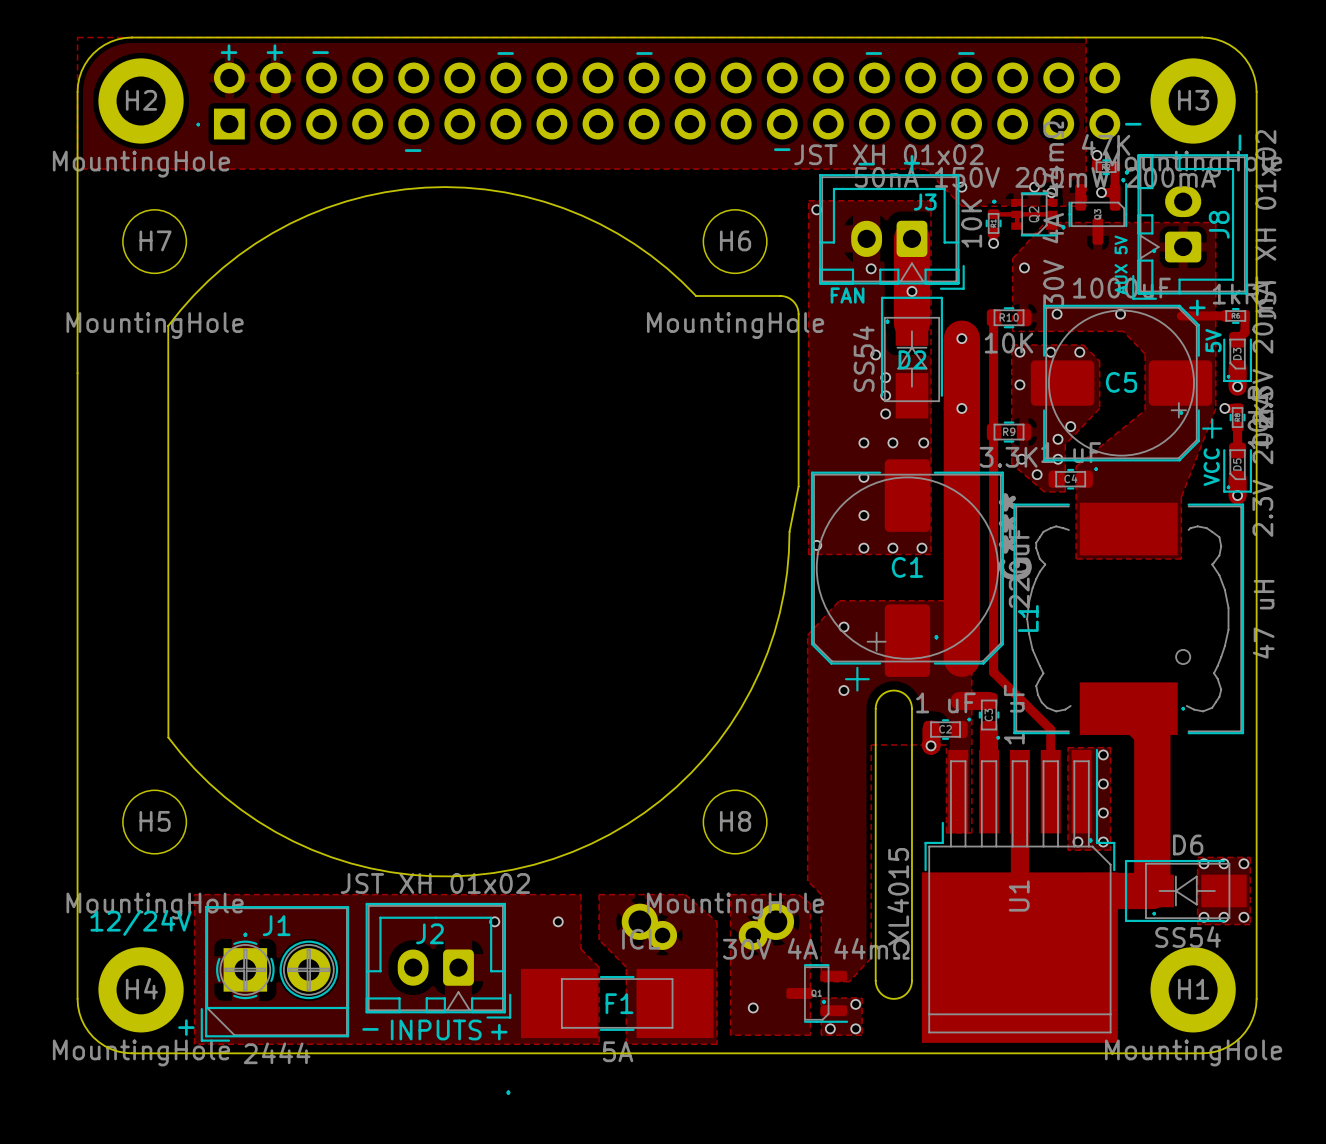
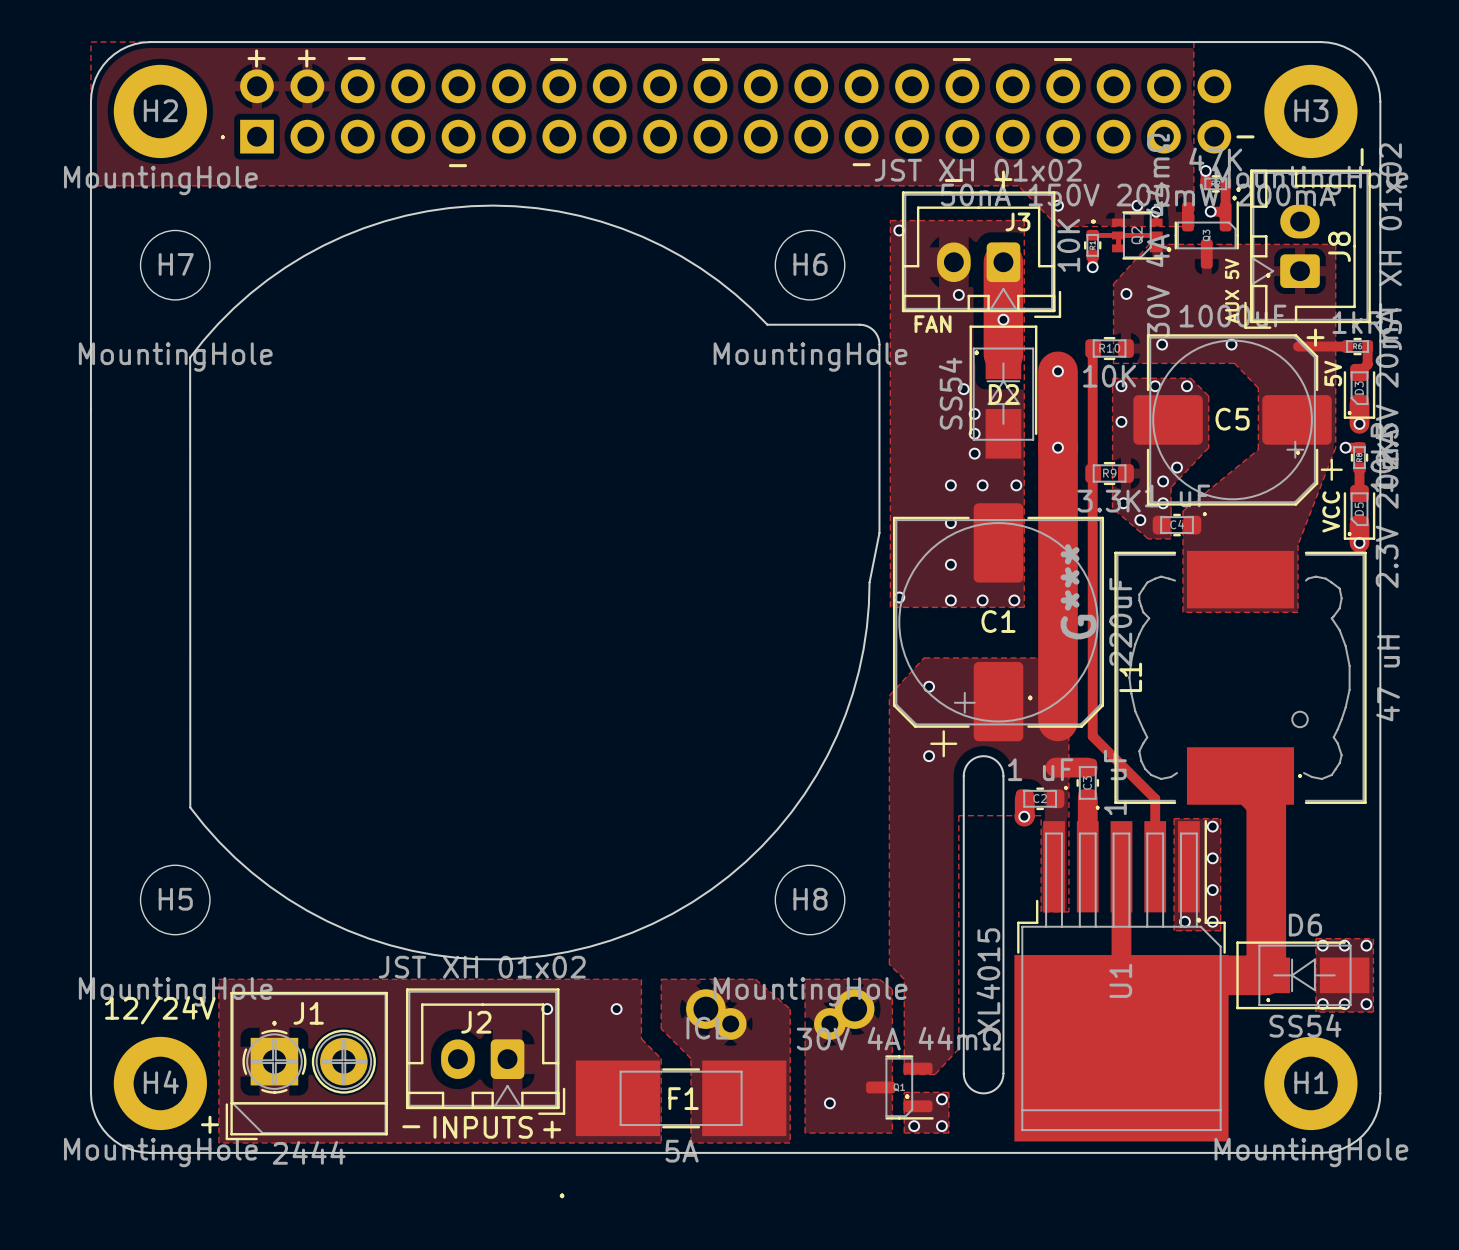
G*** position: (1015, 536) -> (1078, 591)

